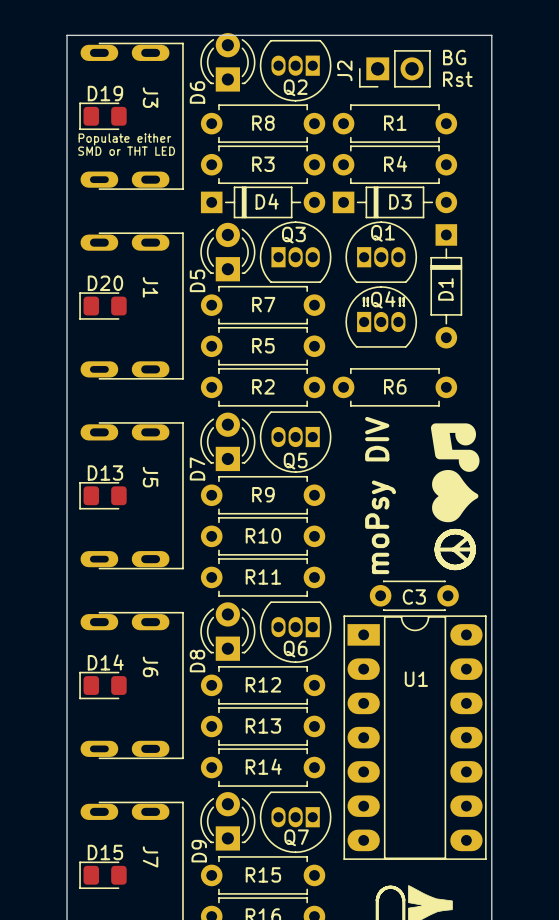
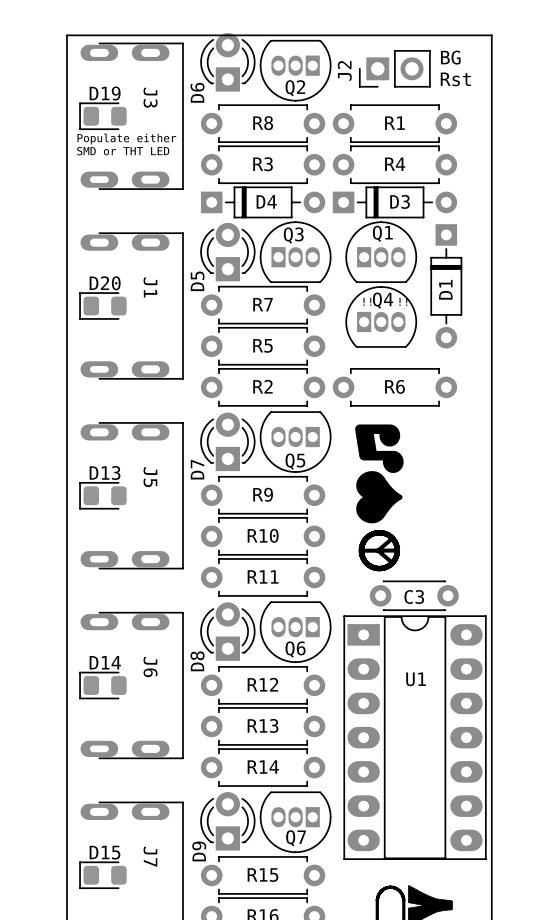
drawing position: (455, 447) -> (379, 448)
text: moPsy DIV (380, 495) -> none
drawing position: (455, 496) -> (379, 497)
line: (454, 531) (467, 536) (473, 548) (468, 561) (456, 567) (443, 562) (437, 550) (441, 537) (454, 531) -> (378, 532) (391, 537) (397, 549) (392, 562) (380, 568) (367, 563) (361, 551) (366, 538) (378, 532)
line: (467, 538) (453, 549) -> (391, 539) (377, 550)
line: (453, 549) (467, 561) -> (377, 550) (391, 562)
line: (471, 549) (438, 549) -> (395, 550) (363, 550)

